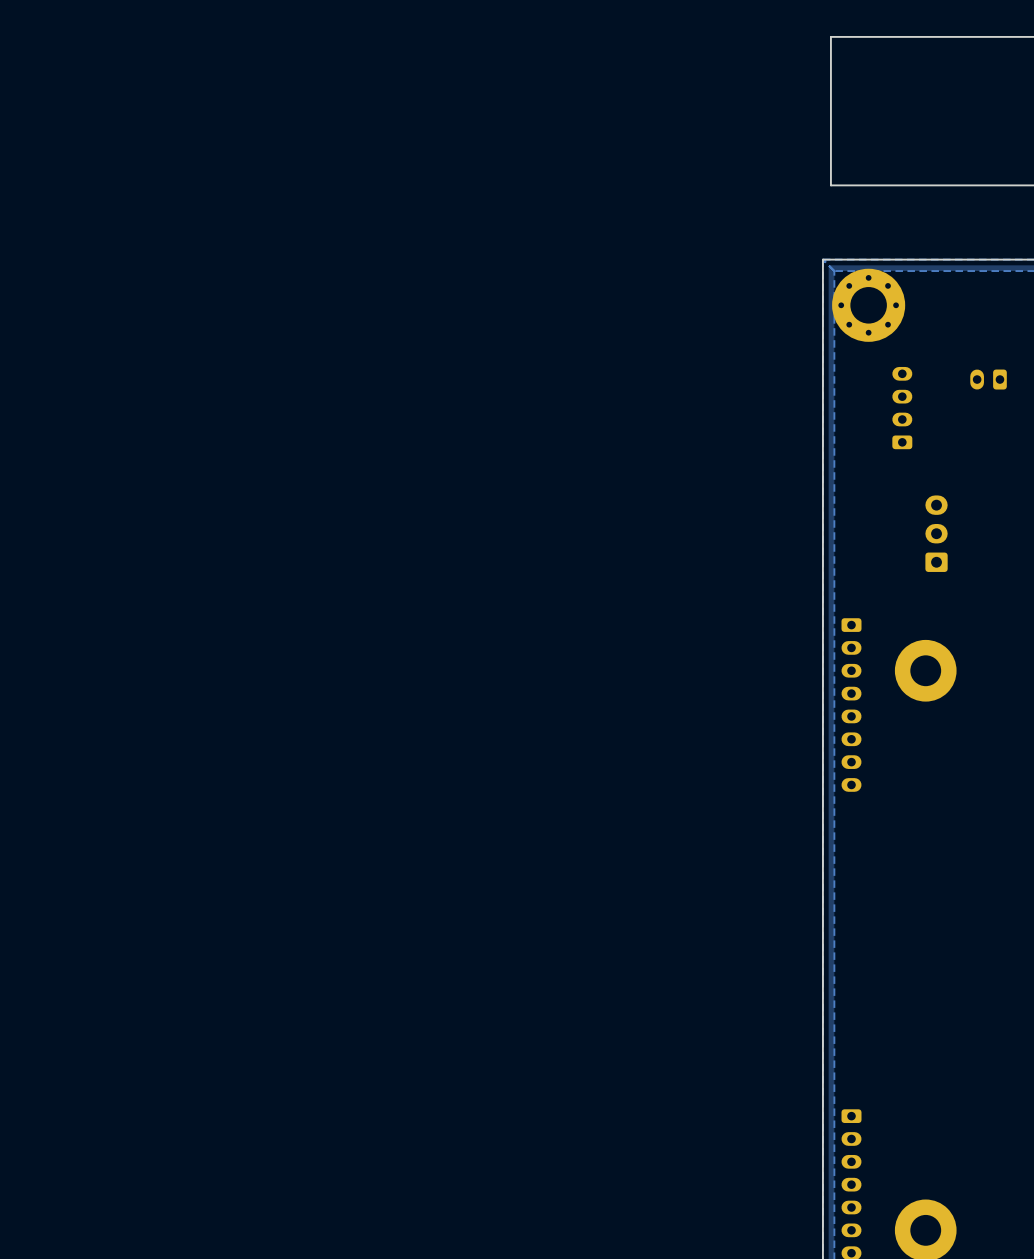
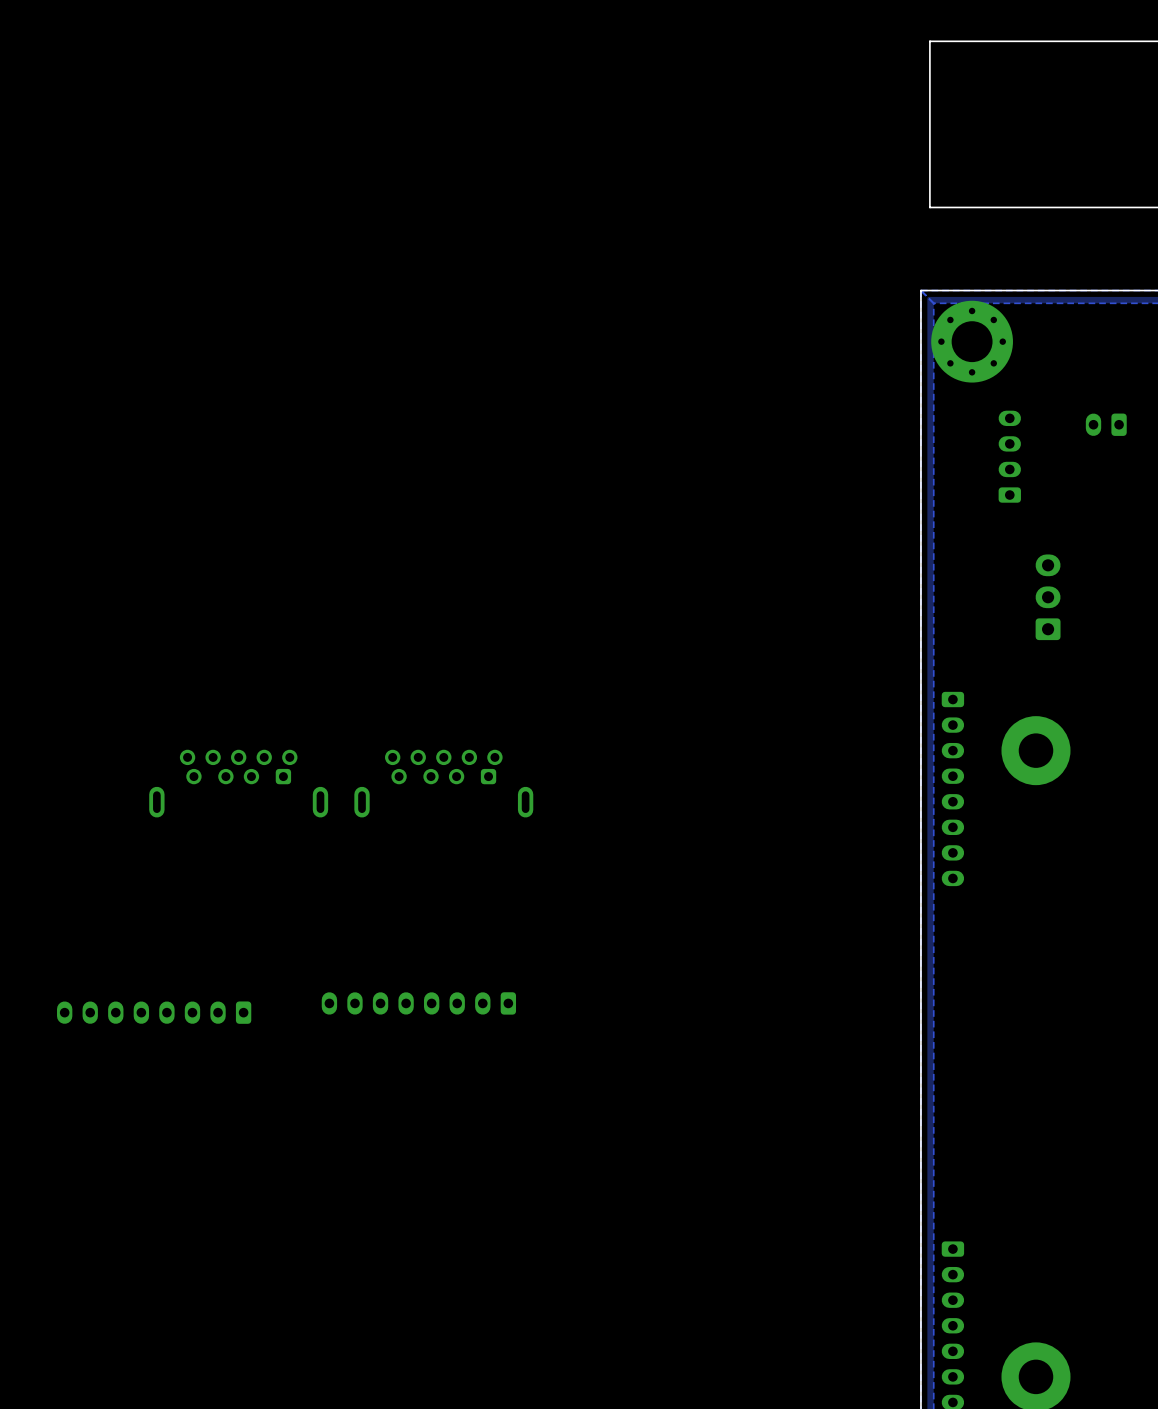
part: none -> (238, 783)
part: none -> (443, 783)
part: none -> (418, 1003)
part: none -> (154, 1012)

